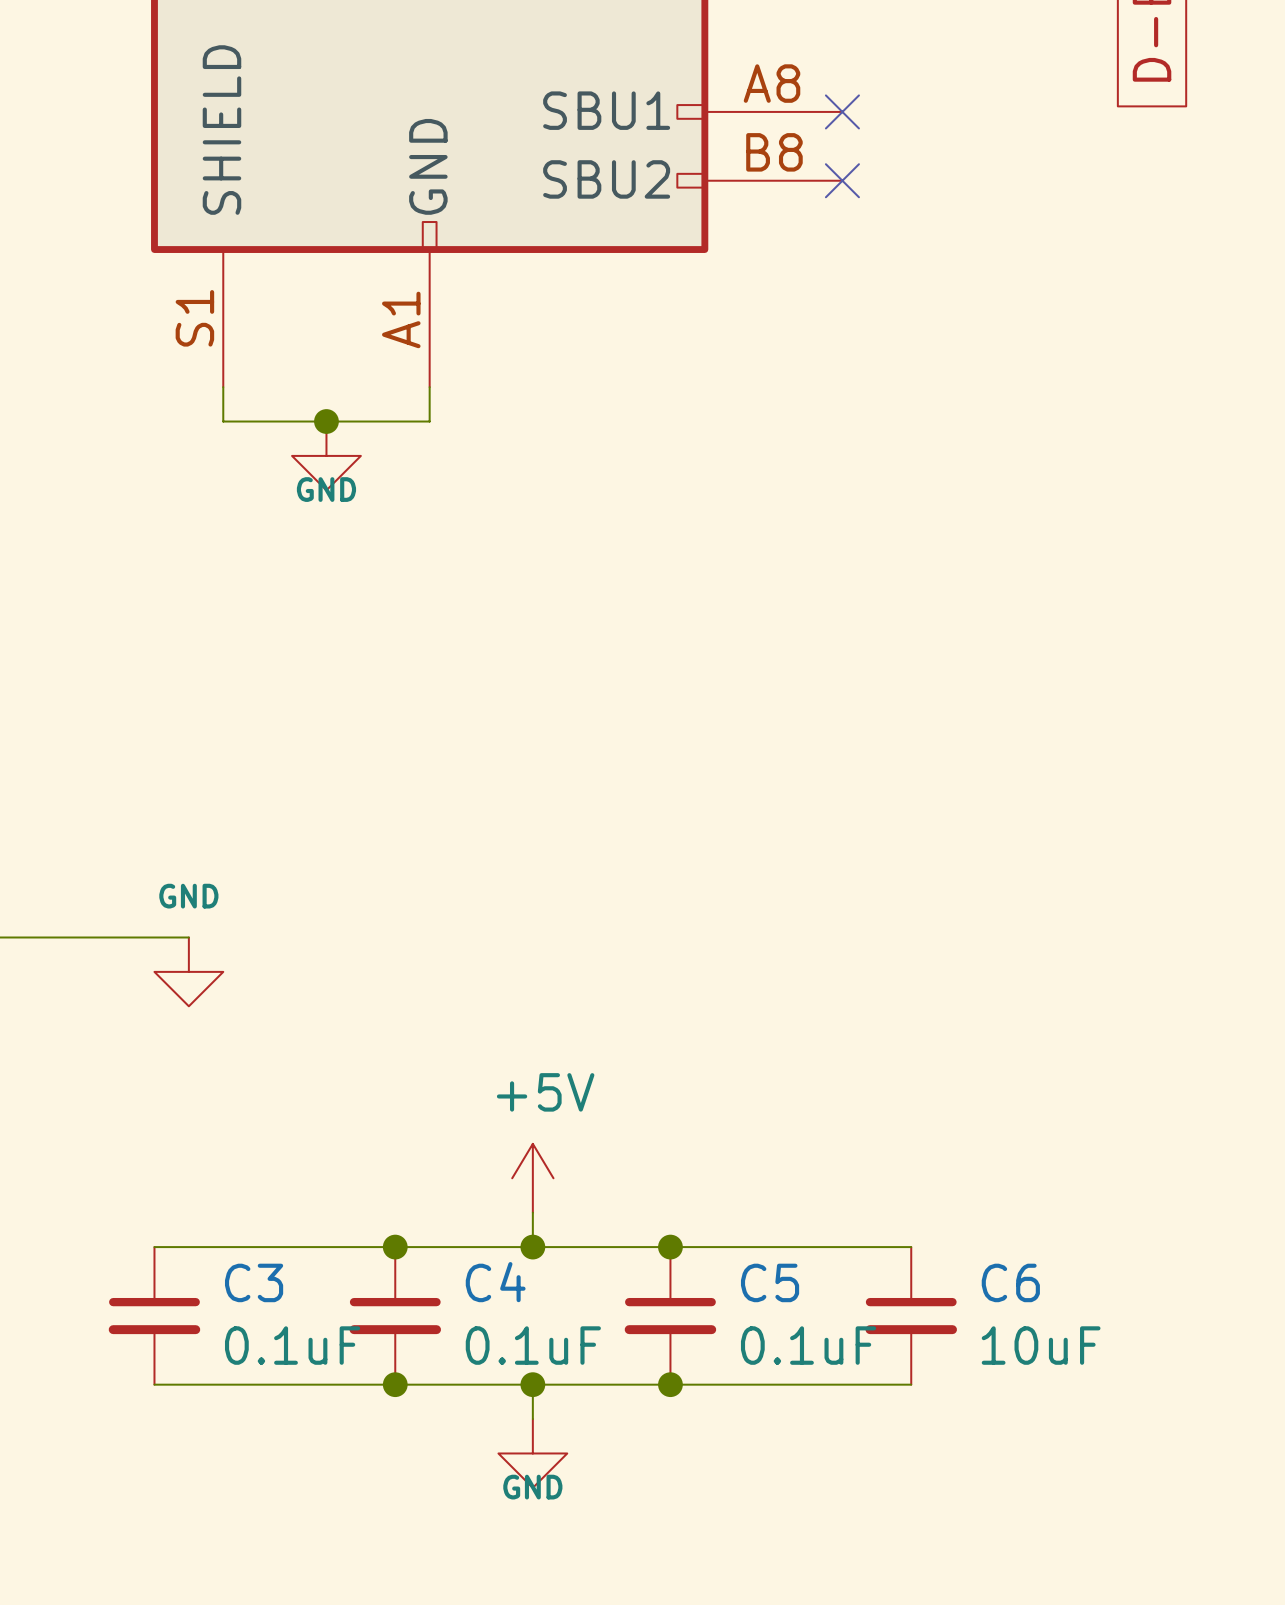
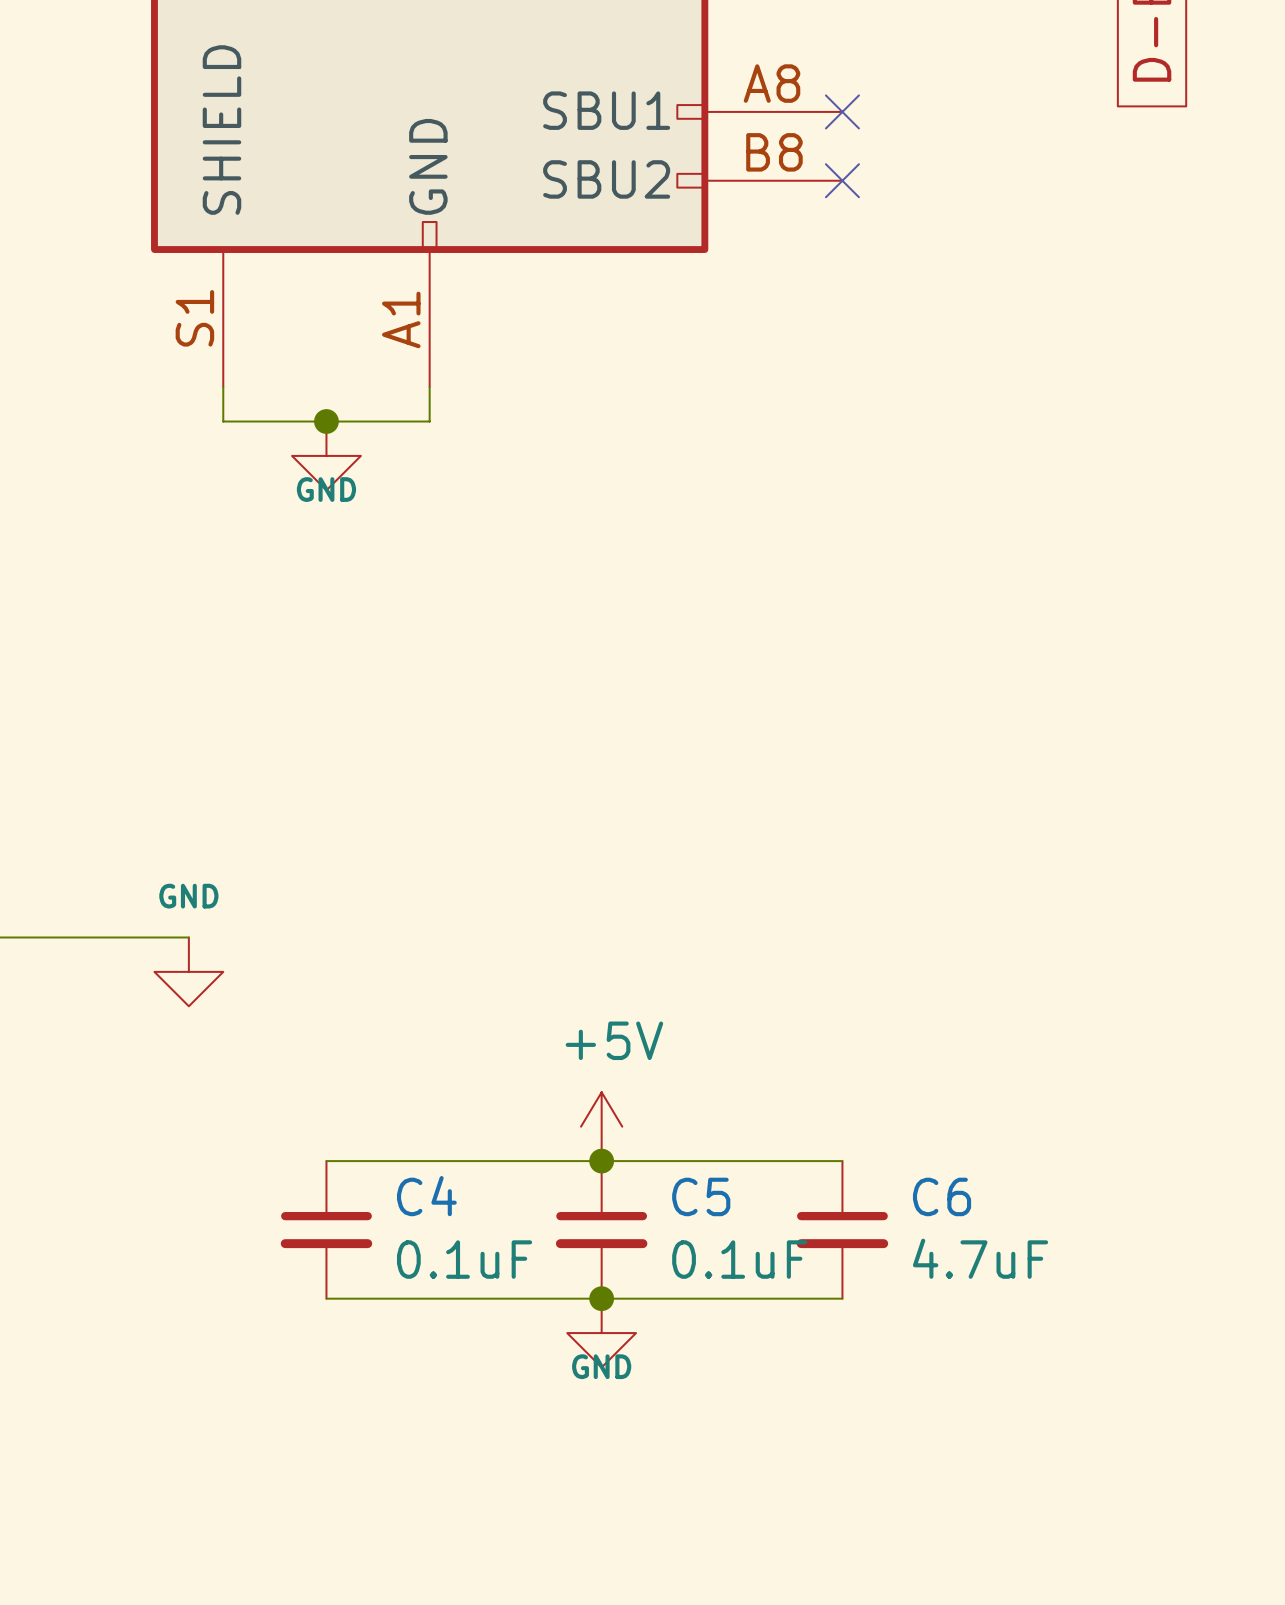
wire: none -> (326, 1161) (842, 1161)
junction: none -> (601, 1161)
power symbol position: +5V (532, 1178) -> +5V (601, 1126)
wire: (532, 1212) (532, 1247) -> none
wire: (154, 1247) (911, 1247) -> none
junction: (395, 1247) -> none
junction: (532, 1247) -> none
junction: (670, 1247) -> none
wire: none -> (326, 1298) (842, 1298)
junction: none -> (601, 1298)
C3: 0.1uF (154, 1315) -> none
C4 position: (395, 1315) -> (326, 1229)
C5 position: (670, 1315) -> (601, 1229)
C6 position: (911, 1315) -> (842, 1229)
C6 value: 10uF (1041, 1345) -> 4.7uF (980, 1258)
wire: (154, 1384) (911, 1384) -> none
junction: (395, 1384) -> none
wire: (532, 1384) (532, 1419) -> none
junction: (532, 1384) -> none
junction: (670, 1384) -> none
power symbol position: GND (532, 1453) -> GND (601, 1333)

